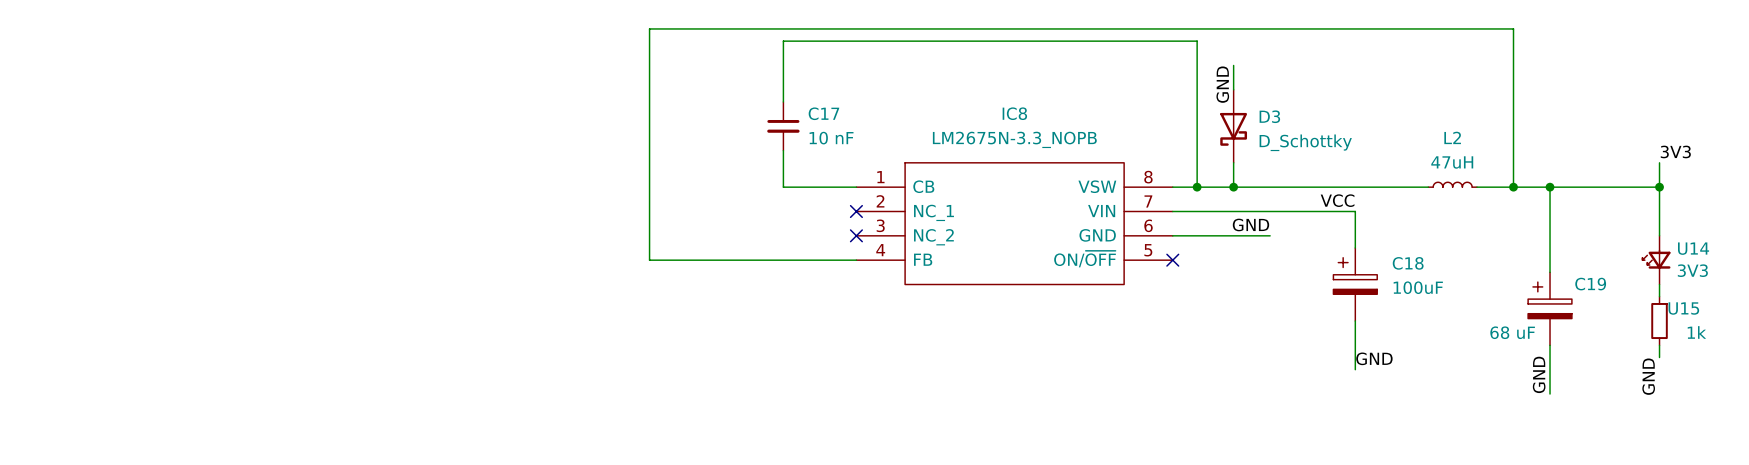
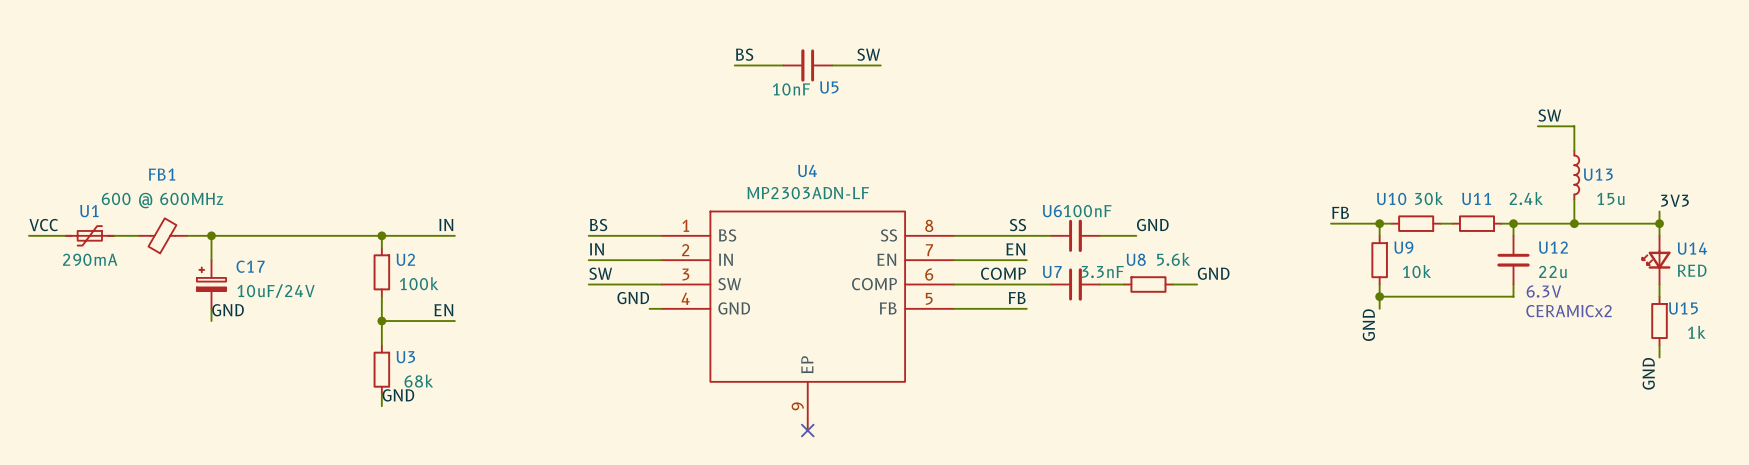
label: none -> BS (744, 54)
label: none -> SW (868, 54)
wire: none -> (734, 65) (783, 65)
U5: none -> 10nF (807, 65)
wire: none -> (832, 65) (880, 65)
wire: (1233, 65) (1233, 89) -> none
label: GND (1222, 84) -> none
C17 symbol: [767, 101, 800, 151] -> [196, 260, 227, 309]
wire: (783, 101) (783, 41) (1197, 41) (1197, 187) -> none
label: none -> SW (1549, 115)
D3: D_Schottky (1233, 126) -> none
wire: none -> (1537, 126) (1574, 126) (1574, 150)
C17 value: 10 nF (831, 138) -> 10uF/24V (276, 291)
wire: (783, 150) (783, 187) (856, 187) -> none
label position: 3V3 (1675, 151) -> 3V3 (1674, 200)
wire: (1233, 162) (1233, 187) -> (1379, 284) (1379, 308)
wire: (1659, 162) (1659, 211) -> none
U13: none -> 15u (1576, 174)
L2: 47uH (1452, 184) -> none
wire: (1172, 187) (1428, 187) -> none
junction: (1197, 187) -> none
junction: (1233, 187) -> none
wire: (1477, 187) (1659, 187) -> none
wire: (1513, 187) (1513, 28) (649, 28) (649, 260) -> (588, 260) (649, 260)
junction: (1513, 187) -> none
wire: (1550, 187) (1550, 272) -> none
junction: (1550, 187) -> none
junction position: (1659, 187) -> (1659, 223)
wire: none -> (1574, 199) (1574, 223)
label: VCC (1337, 200) -> none
no-connect mark: (856, 211) -> none
wire: (1172, 211) (1355, 211) (1355, 248) -> none
label: none -> FB (1340, 212)
IC8: LM2675N-3.3_NOPB (1014, 223) -> none
wire: none -> (1330, 223) (1391, 223)
wire: none -> (1379, 223) (1379, 235)
junction: none -> (1379, 223)
U10: none -> 30k (1416, 223)
wire: none -> (1440, 223) (1452, 223)
U11: none -> 2.4k (1477, 223)
wire: none -> (1501, 223) (1659, 223)
wire: none -> (1513, 223) (1513, 235)
junction: none -> (1513, 223)
junction: none -> (1574, 223)
label: none -> VCC (43, 225)
label: none -> IN (446, 224)
label: none -> BS (598, 225)
label: none -> SS (1017, 225)
label: none -> GND (1152, 225)
label: GND (1250, 224) -> none
wire: none -> (28, 235) (65, 235)
U1: none -> 290mA (89, 235)
wire: none -> (114, 235) (138, 235)
FB1: none -> 600 @ 600MHz (162, 235)
wire: none -> (187, 235) (454, 235)
wire: none -> (211, 235) (211, 260)
junction: none -> (211, 235)
wire: none -> (381, 235) (381, 248)
junction: none -> (381, 235)
wire: none -> (588, 235) (661, 235)
no-connect mark: (856, 235) -> none
U6: none -> 100nF (1075, 235)
wire: (1172, 235) (1270, 235) -> (953, 235) (1051, 235)
label: none -> IN (596, 249)
label: none -> EN (1015, 249)
wire: (661, 260) (856, 260) -> none
wire: none -> (953, 260) (1026, 260)
no-connect mark: (1172, 260) -> none
U9: none -> 10k (1379, 260)
U12: none -> 22u (1513, 260)
U14 value: 3V3 (1692, 270) -> RED (1692, 270)
U2: none -> 100k (381, 272)
label: none -> SW (600, 273)
label: none -> COMP (1003, 273)
label: none -> GND (1213, 273)
wire: none -> (588, 284) (661, 284)
U7: none -> 3.3nF (1075, 284)
U8: none -> 5.6k (1148, 284)
wire: none -> (1172, 284) (1197, 284)
C18: 100uF (1355, 284) -> none
wire: none -> (1513, 284) (1513, 296) (1379, 296)
text: none -> 6.3V (1543, 291)
wire: none -> (381, 296) (381, 345)
junction: none -> (1379, 296)
label: none -> GND (633, 298)
label: none -> FB (1017, 298)
wire: none -> (211, 308) (211, 321)
wire: none -> (649, 308) (661, 308)
wire: none -> (953, 308) (1026, 308)
C19: 68 uF (1550, 308) -> none
label: none -> GND (228, 310)
label: none -> EN (443, 310)
text: none -> CERAMICx2 (1569, 311)
U4: none -> MP2303ADN-LF (807, 320)
wire: none -> (381, 321) (454, 321)
junction: none -> (381, 321)
wire: (1355, 321) (1355, 369) -> none
wire: (1550, 345) (1550, 394) -> none
label rotation: 0° (1374, 358) -> 90° counterclockwise (1368, 325)
U3: none -> 68k (381, 369)
label: GND (1539, 374) -> none
wire: none -> (381, 394) (381, 406)
label: none -> GND (398, 395)
no-connect mark: none -> (807, 430)

